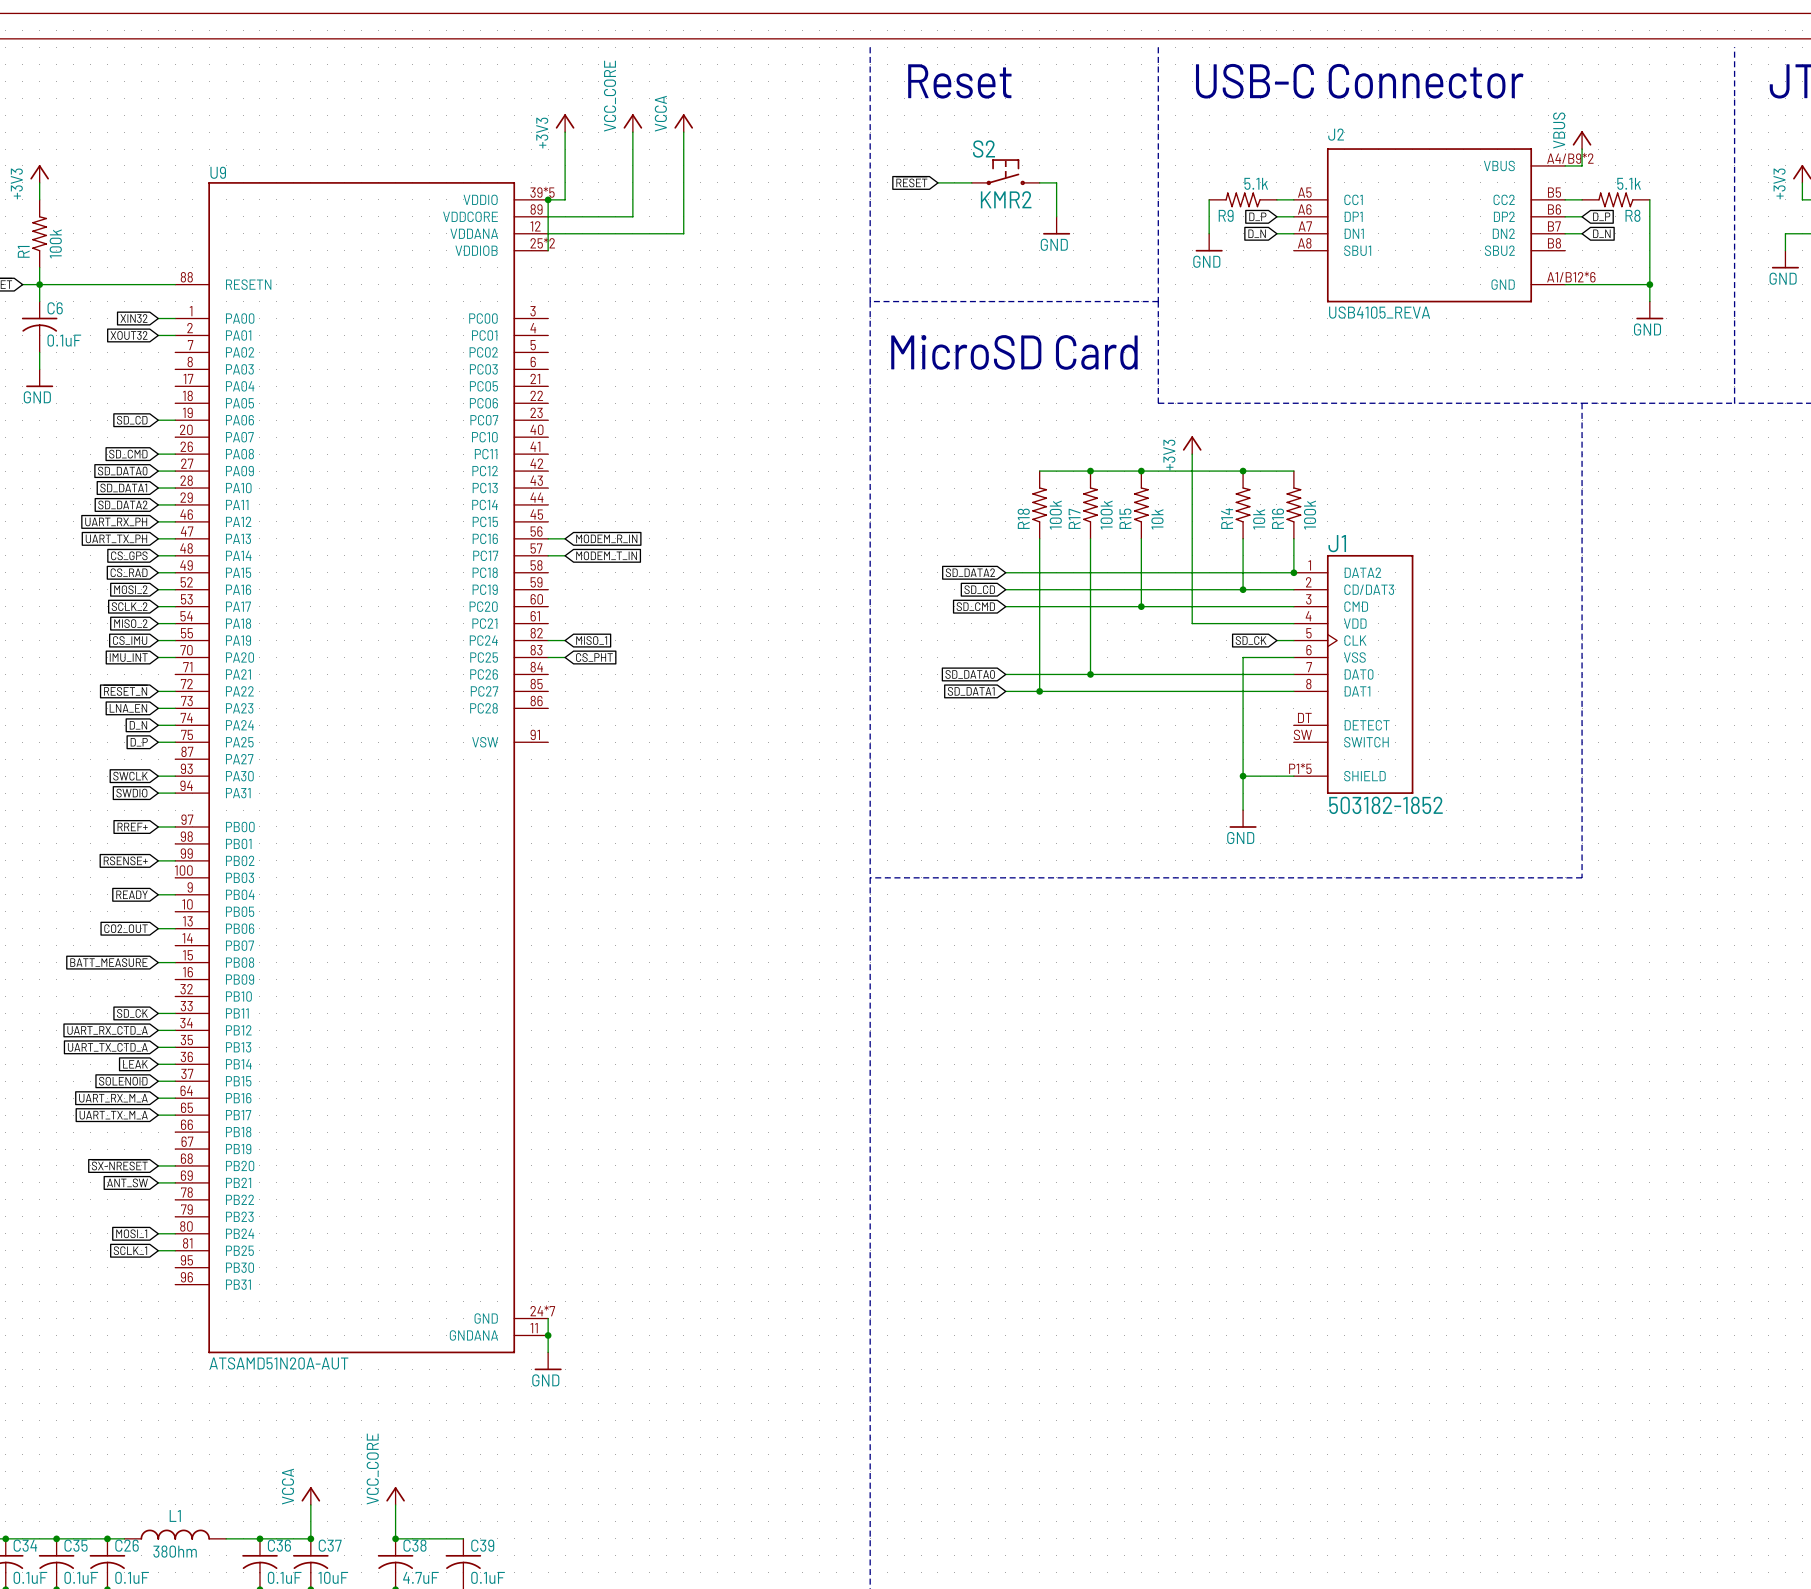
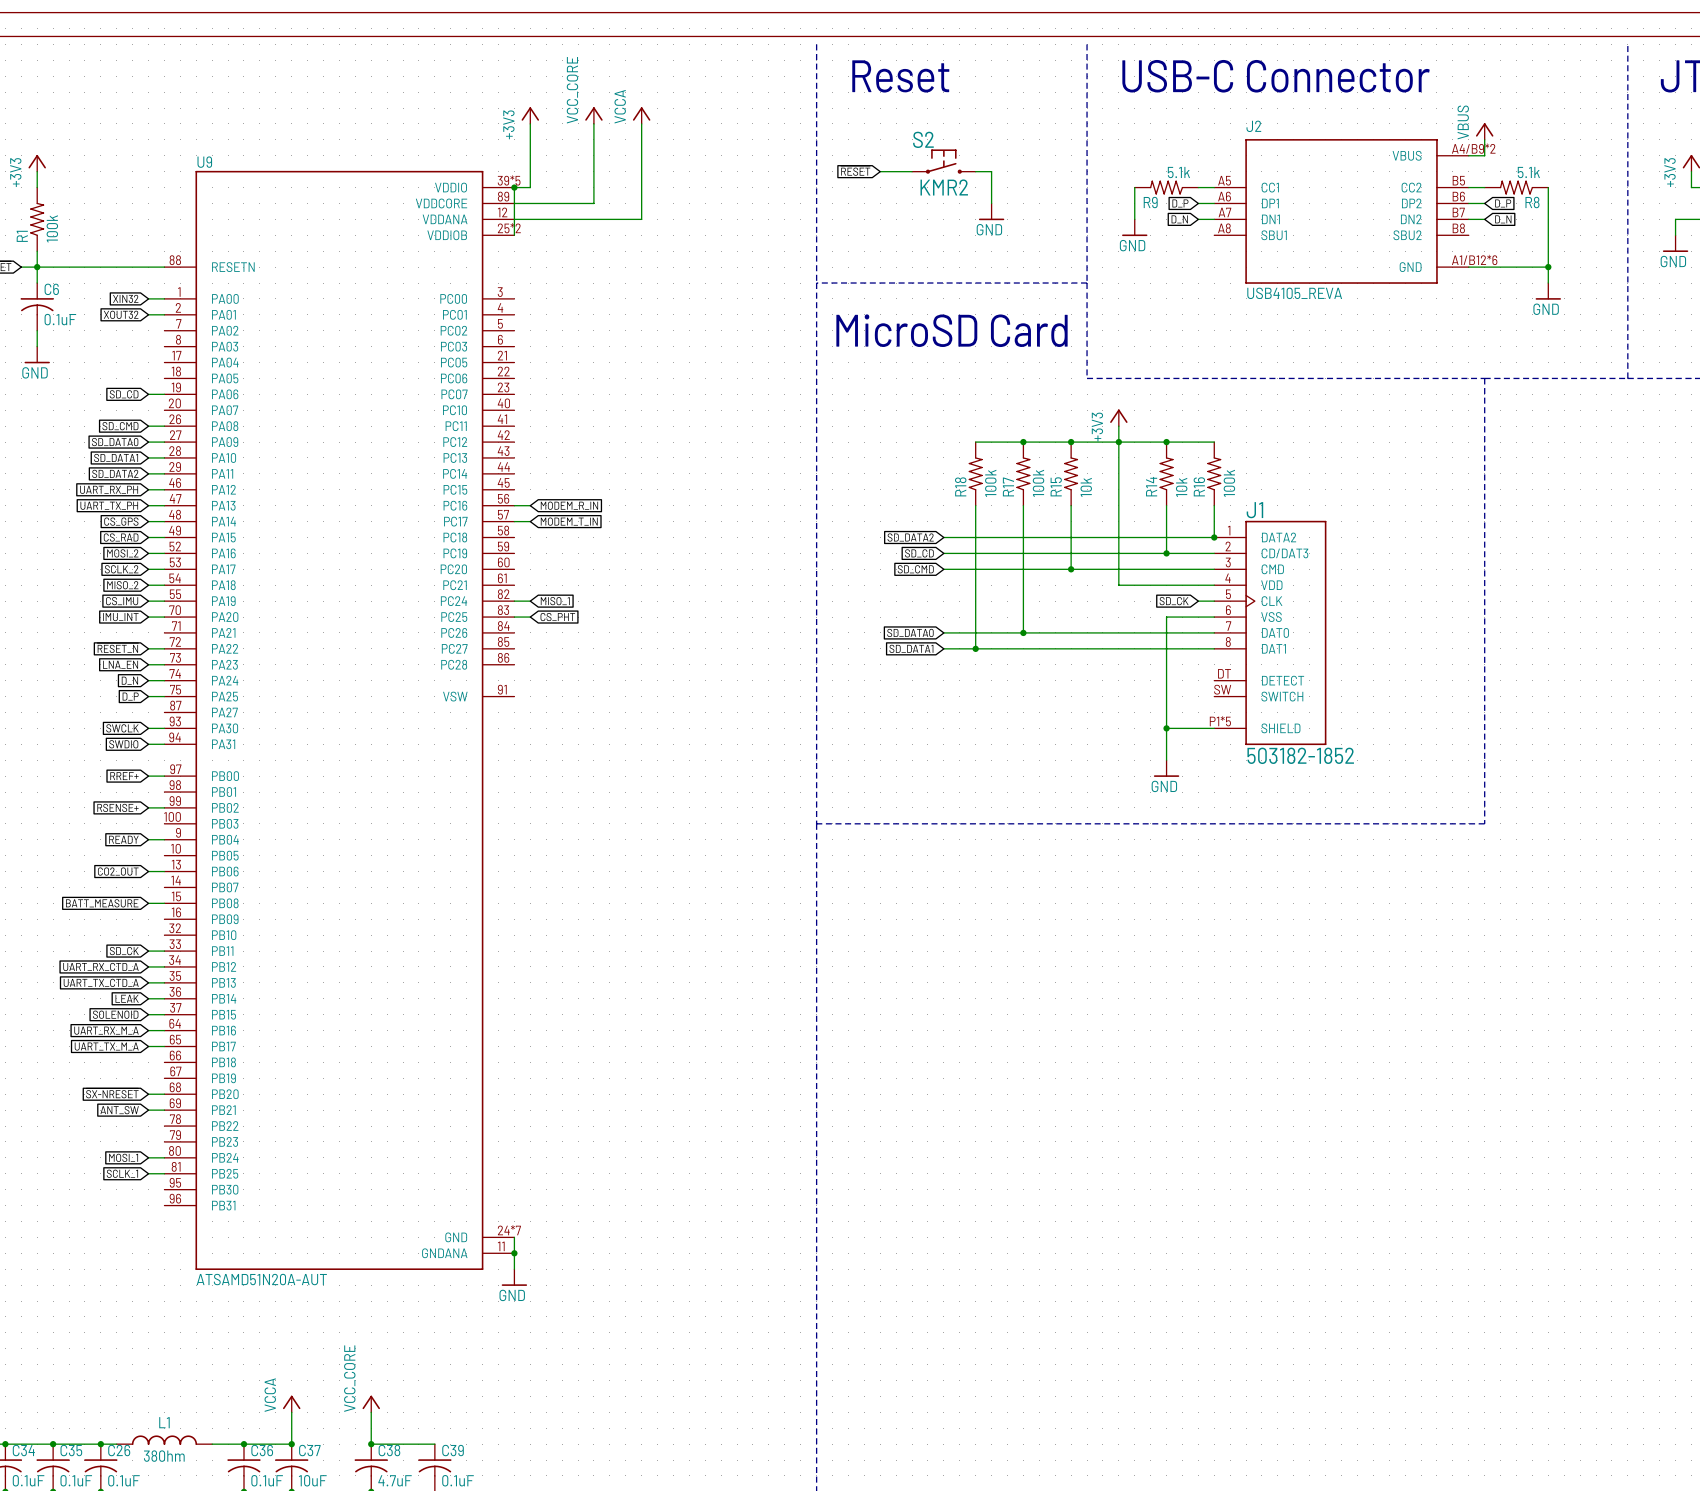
junction: none -> (1118, 442)

